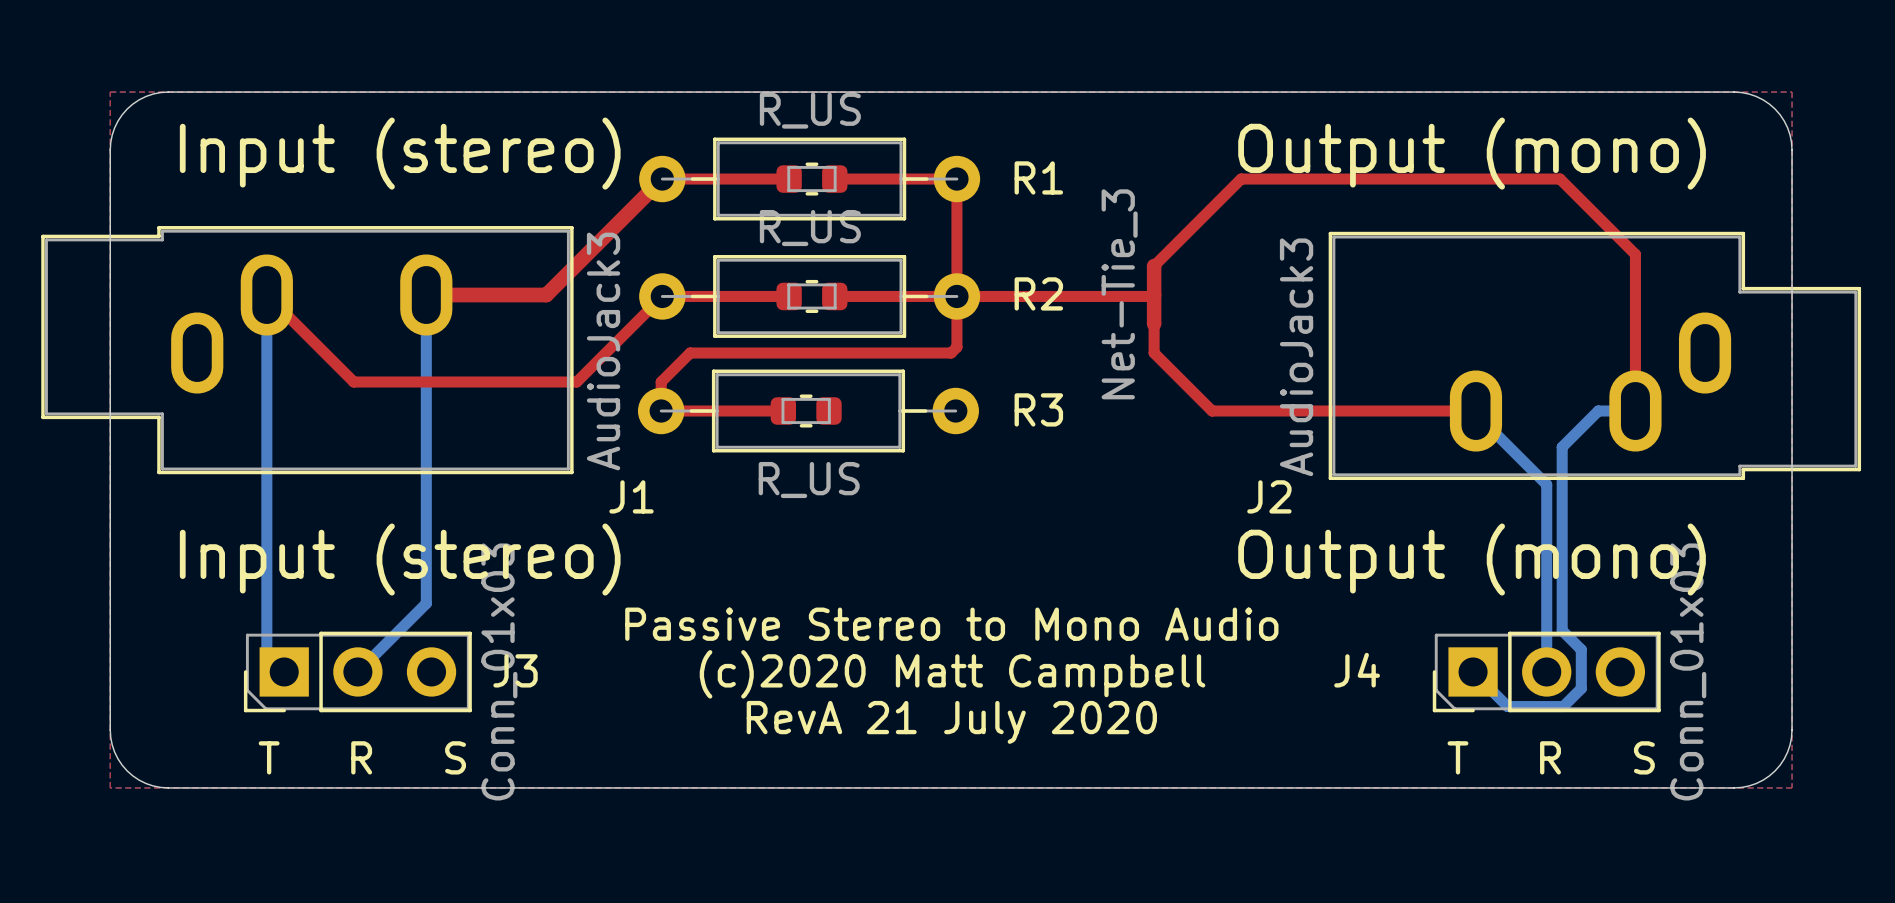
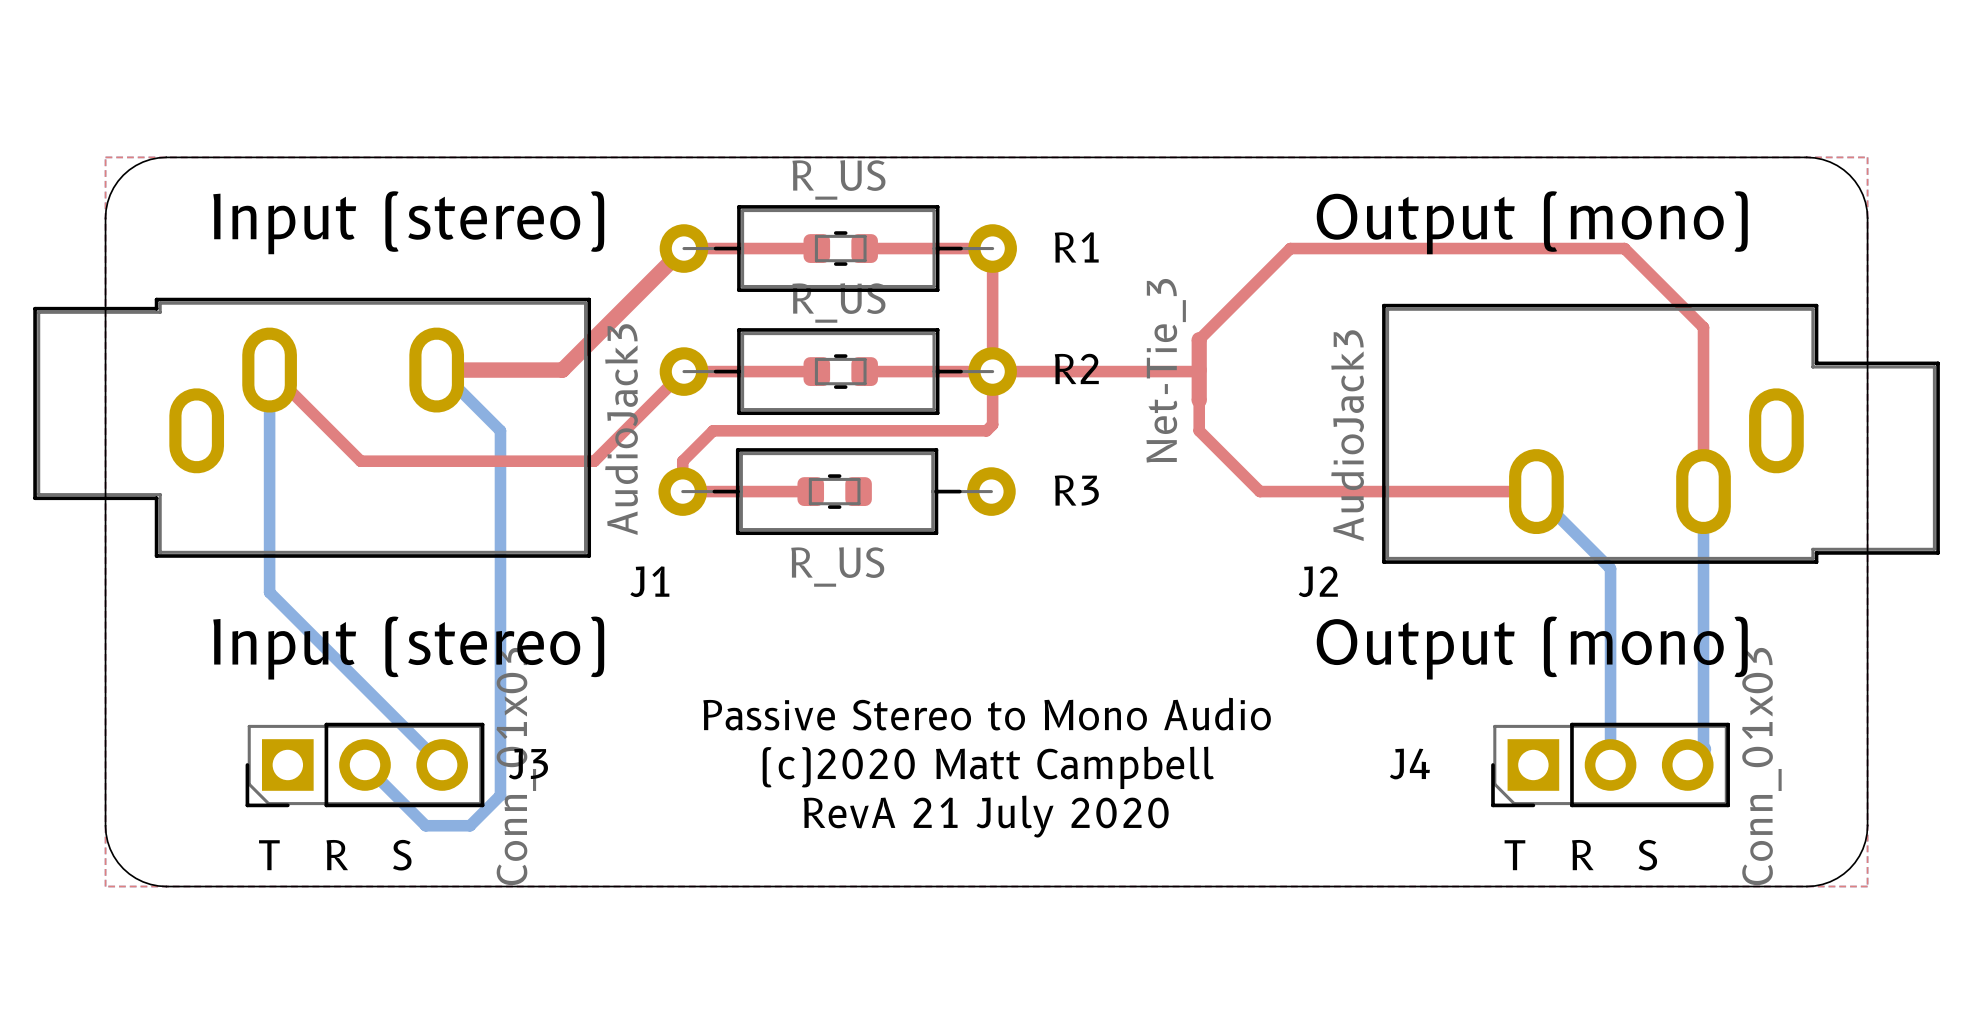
bottom track: (426, 295) (426, 603) (357, 671) -> (439, 370) (500, 430) (500, 795) (470, 825) (425, 825) (364, 764)
bottom track: (1635, 411) (1598, 411) (1562, 447) (1562, 630) (1581, 649) (1581, 688) (1563, 706) (1507, 706) (1473, 671) -> (1703, 491) (1703, 749) (1687, 764)
bottom track: (266, 507) (266, 654) (284, 671) -> (269, 592) (442, 764)

